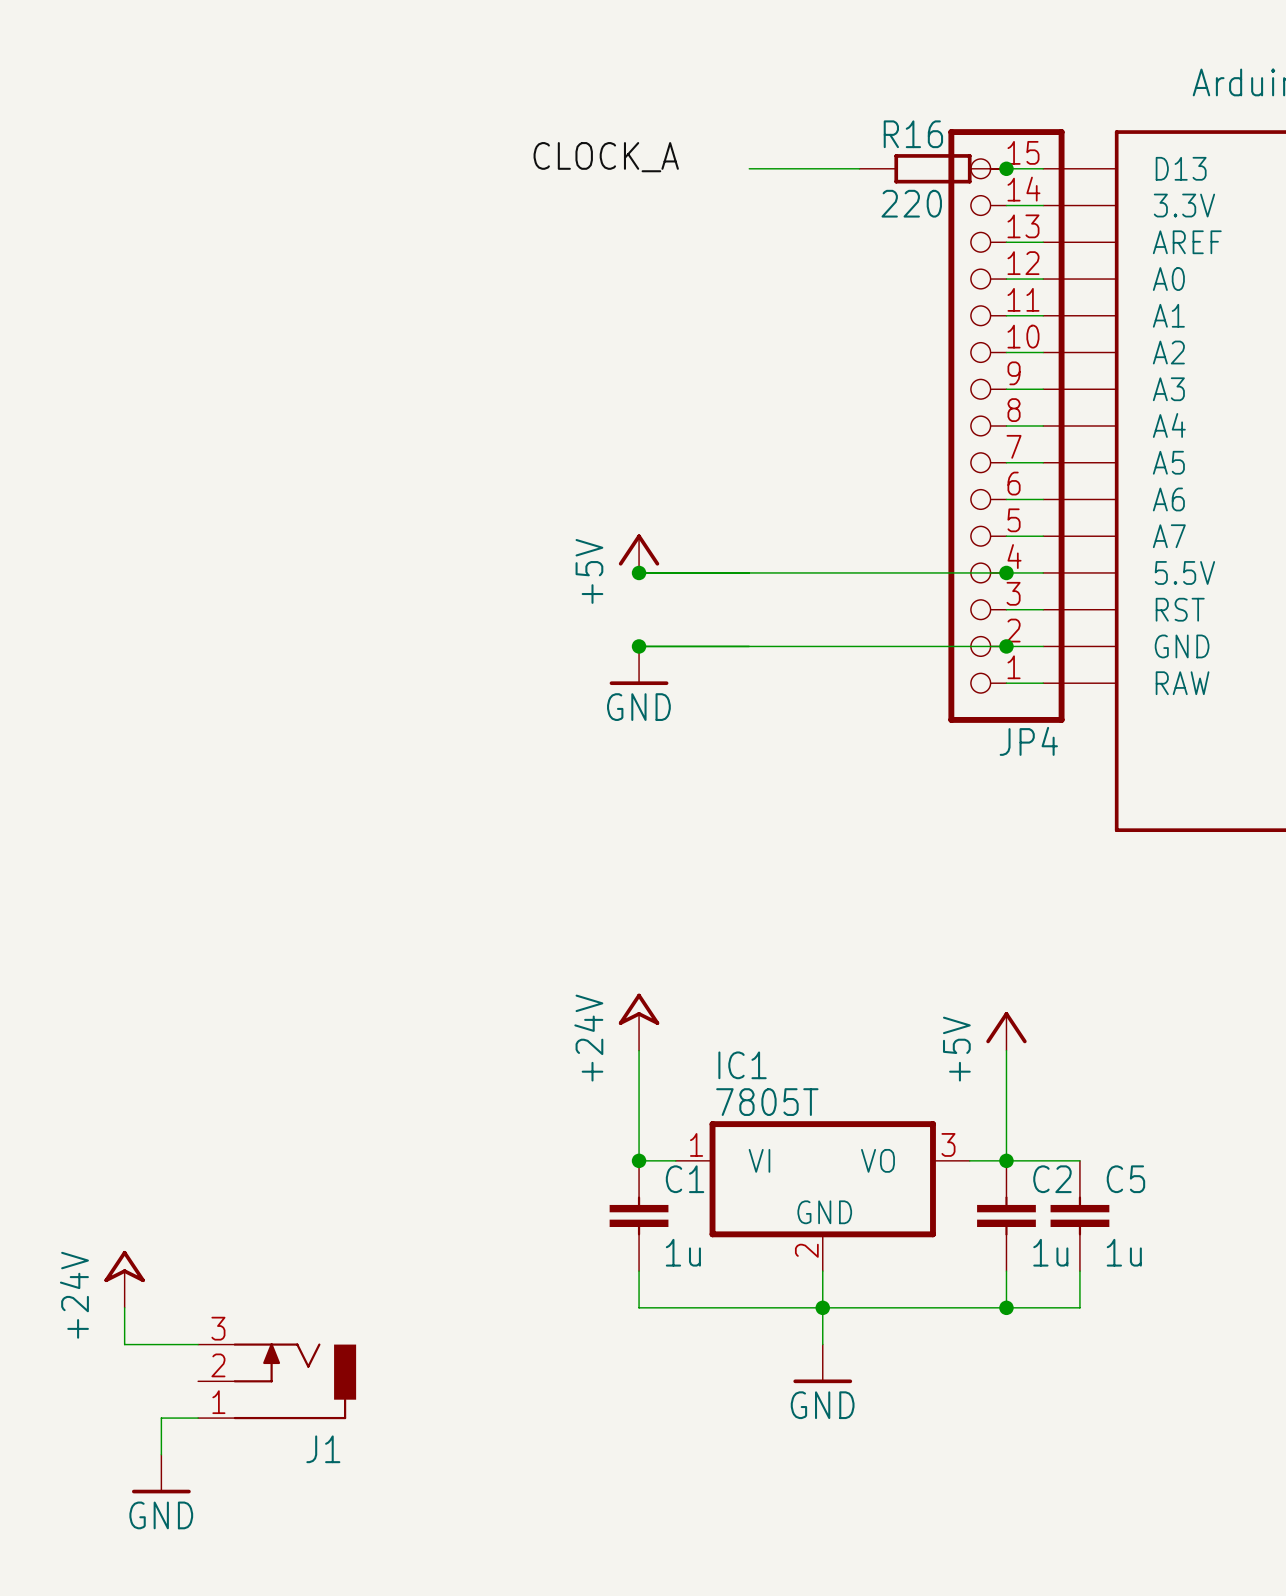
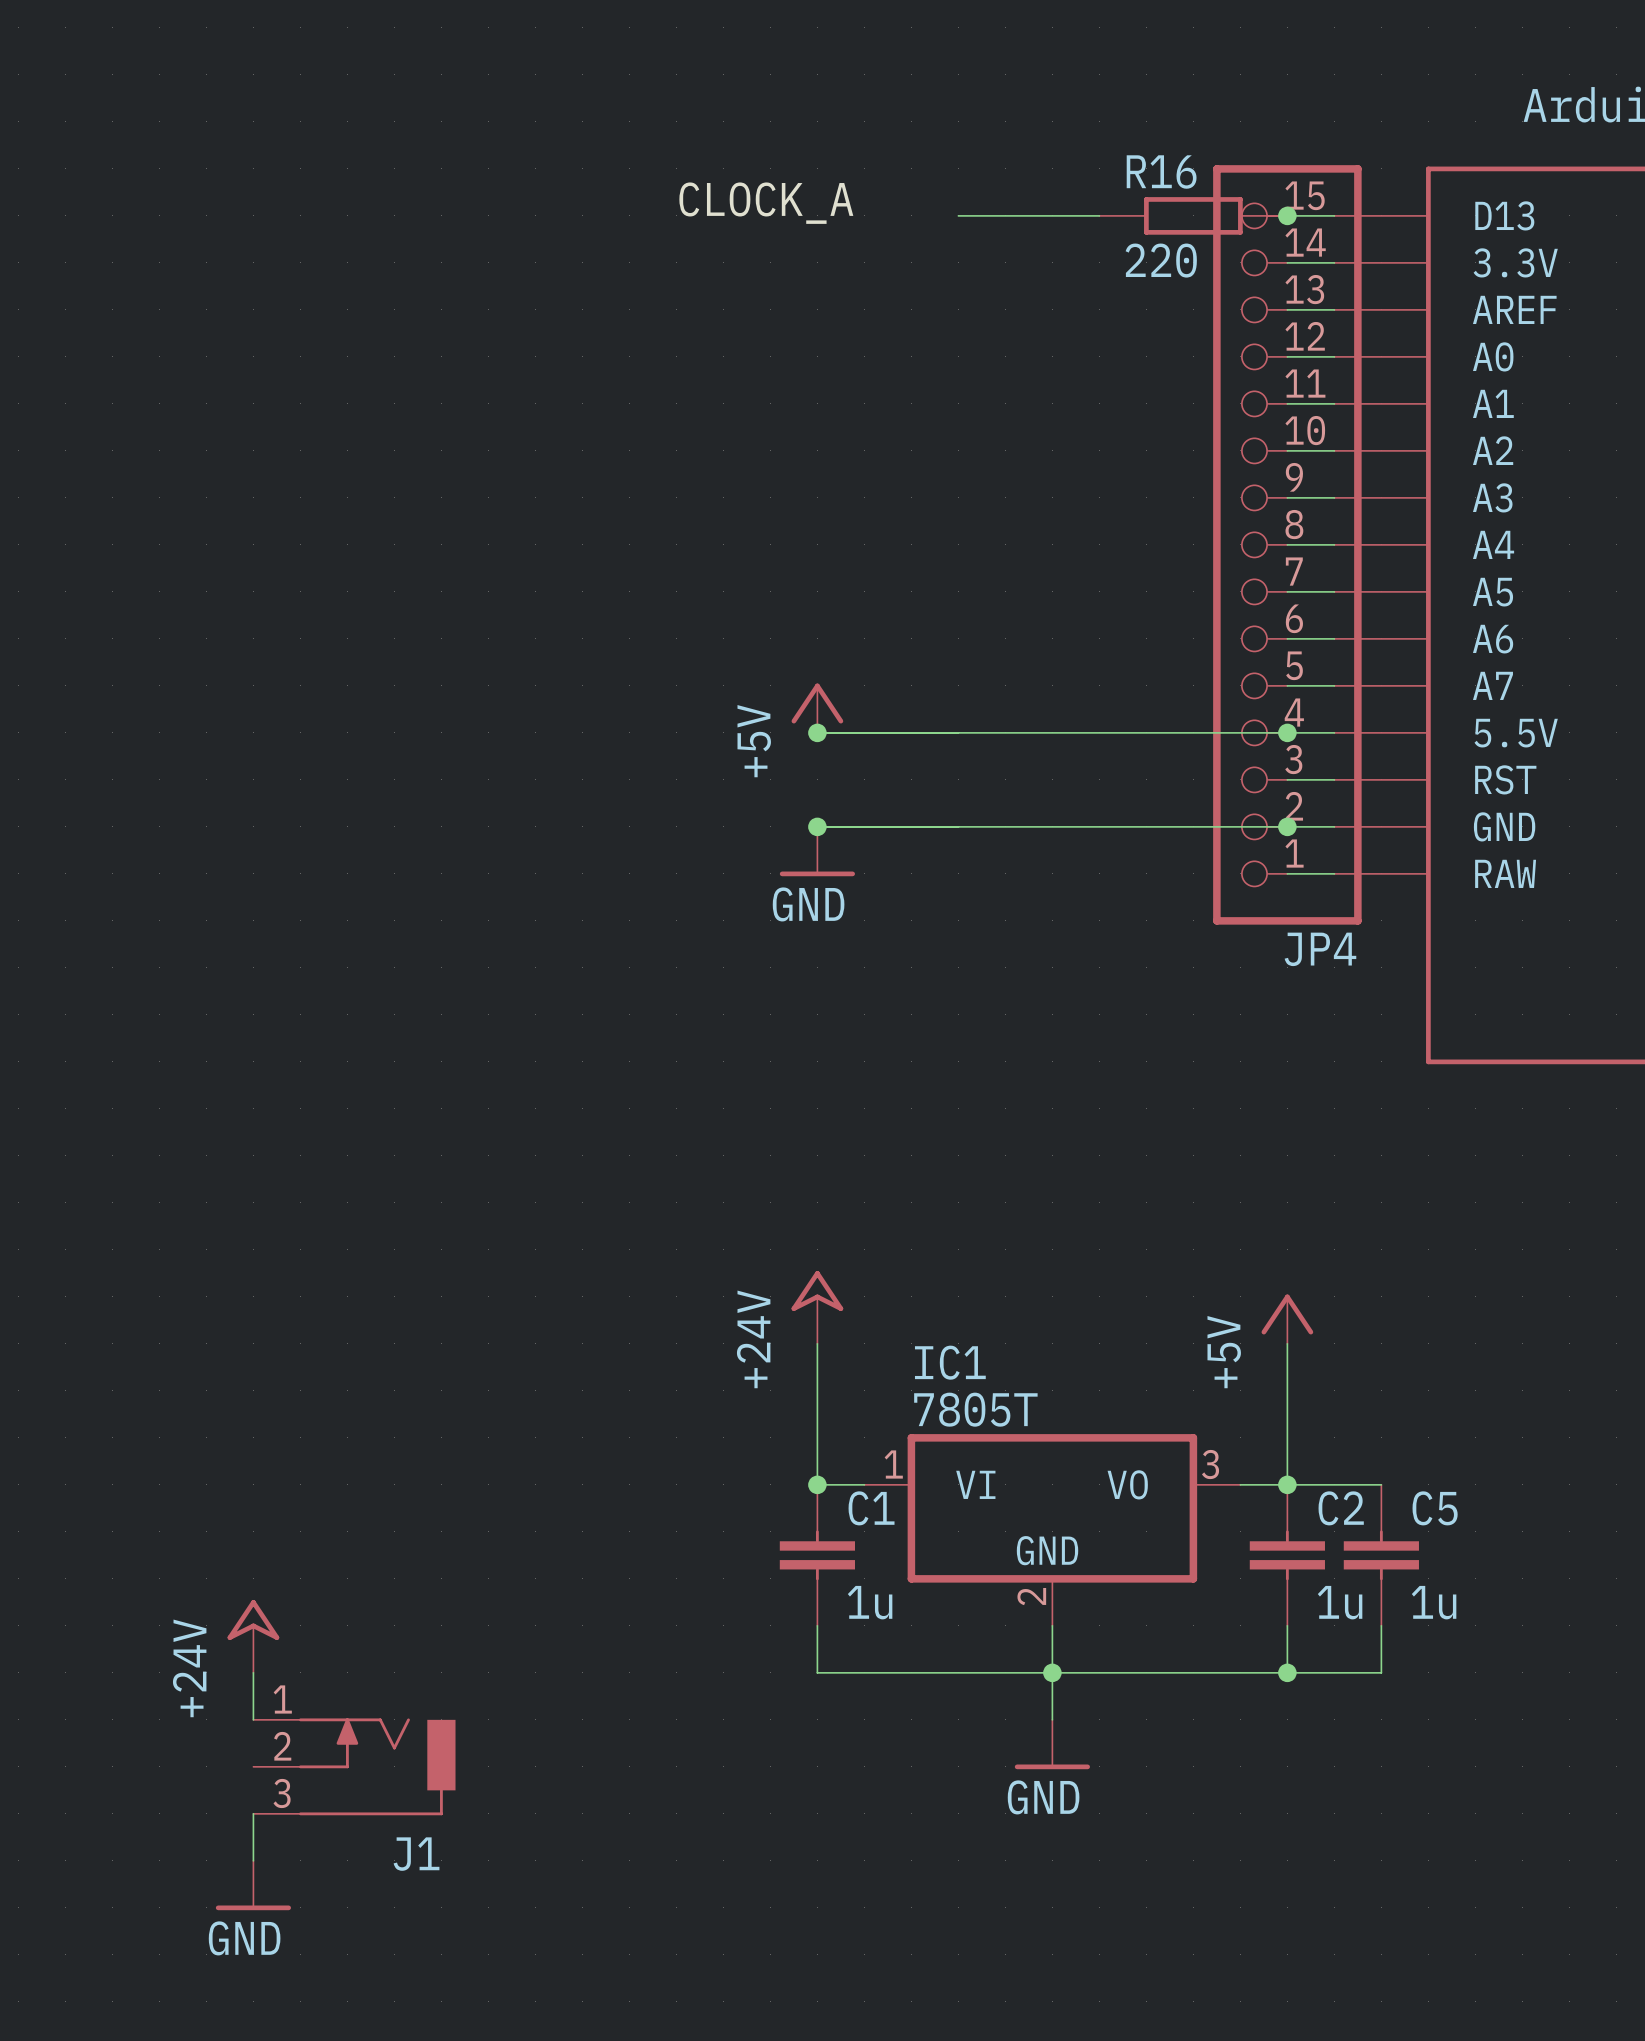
power symbol position: +24V (124, 1279) -> +24V (253, 1636)
wire: (124, 1307) (124, 1344) (198, 1344) -> (253, 1672) (253, 1719)
J1 pin number: 3 (218, 1328) -> 1 (282, 1699)
J1 pin number: 1 (218, 1402) -> 3 (282, 1793)
wire: (198, 1418) (161, 1418) (161, 1454) -> (253, 1813) (253, 1860)
power symbol position: GND (161, 1474) -> GND (253, 1885)

